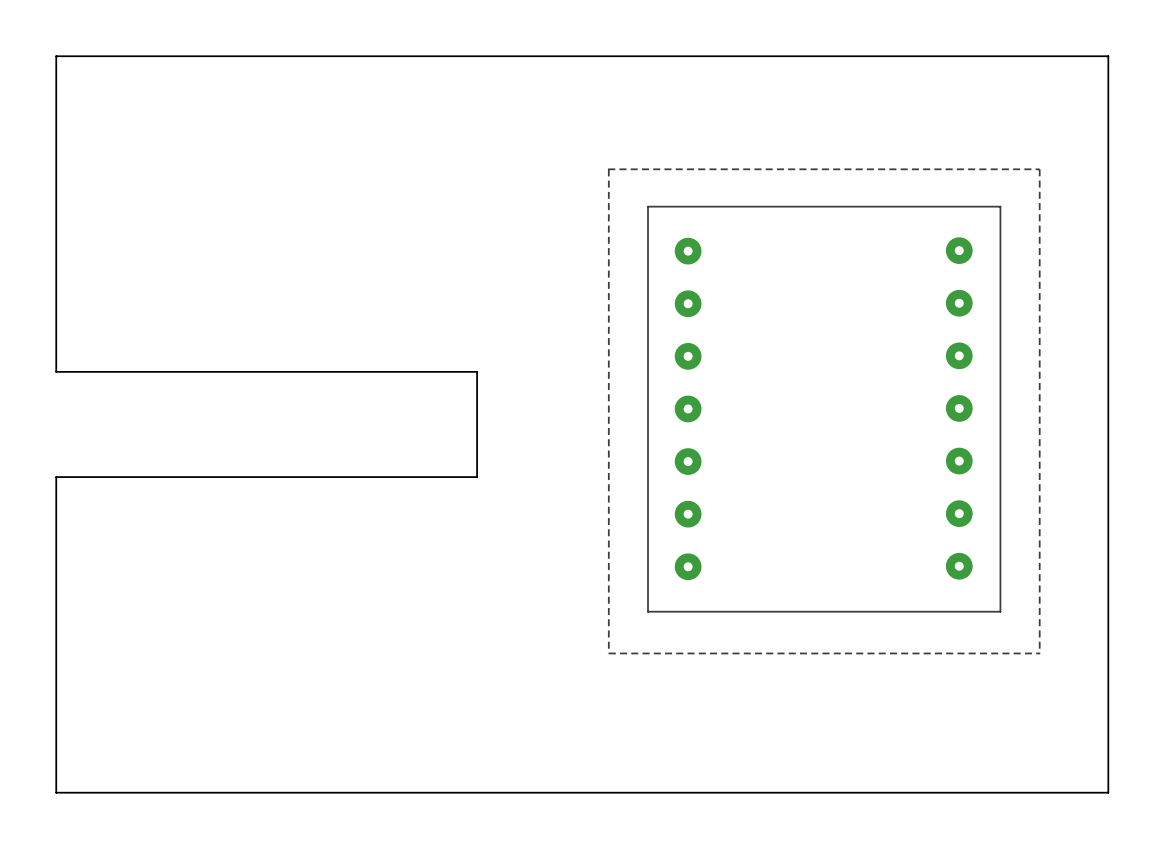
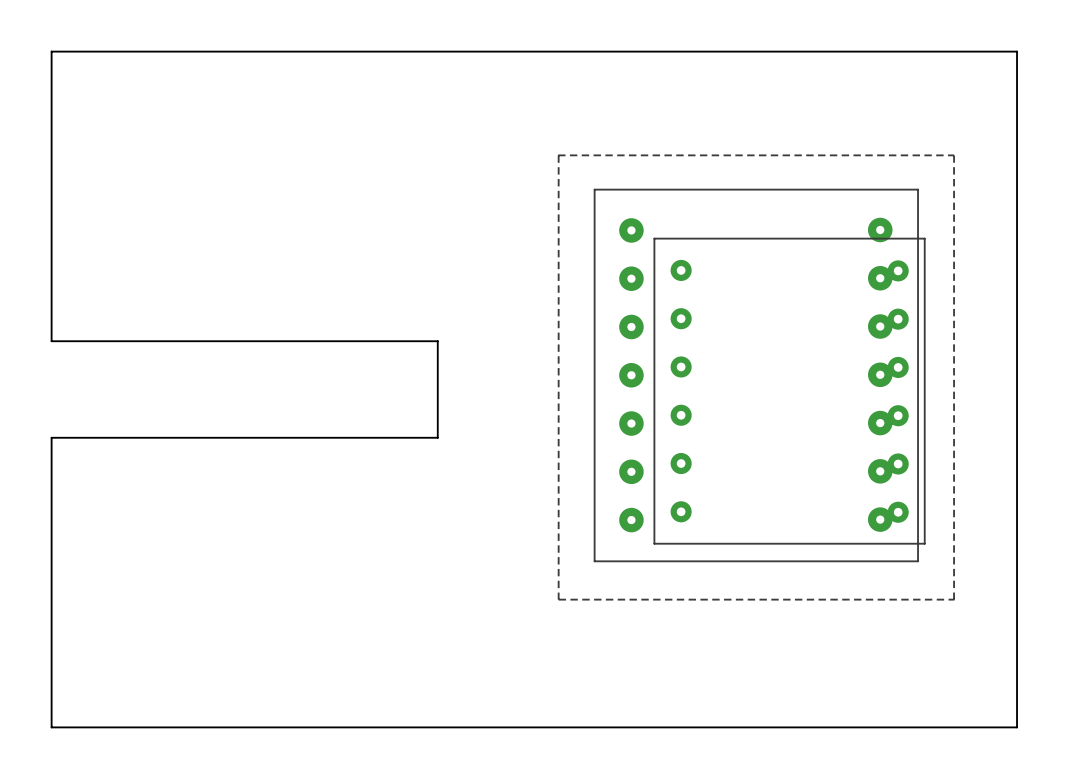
part: none -> (789, 391)

